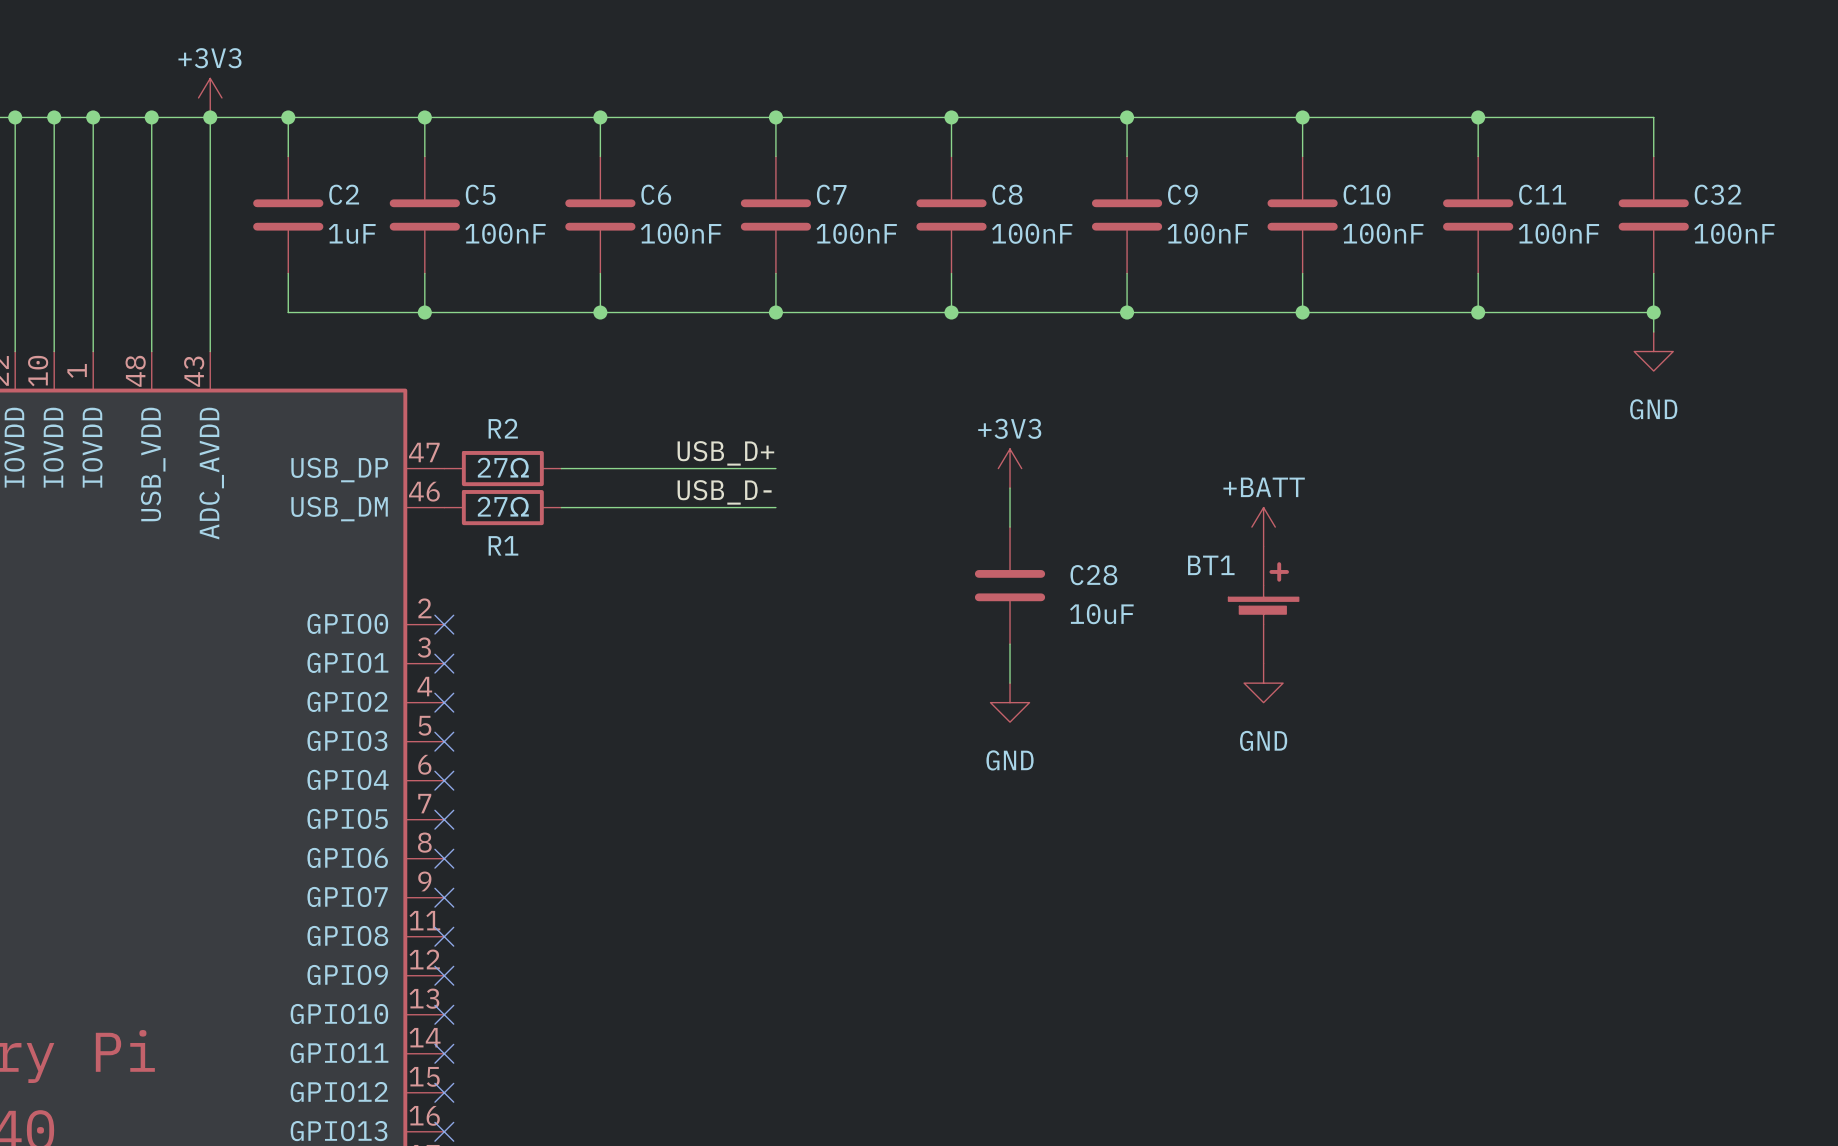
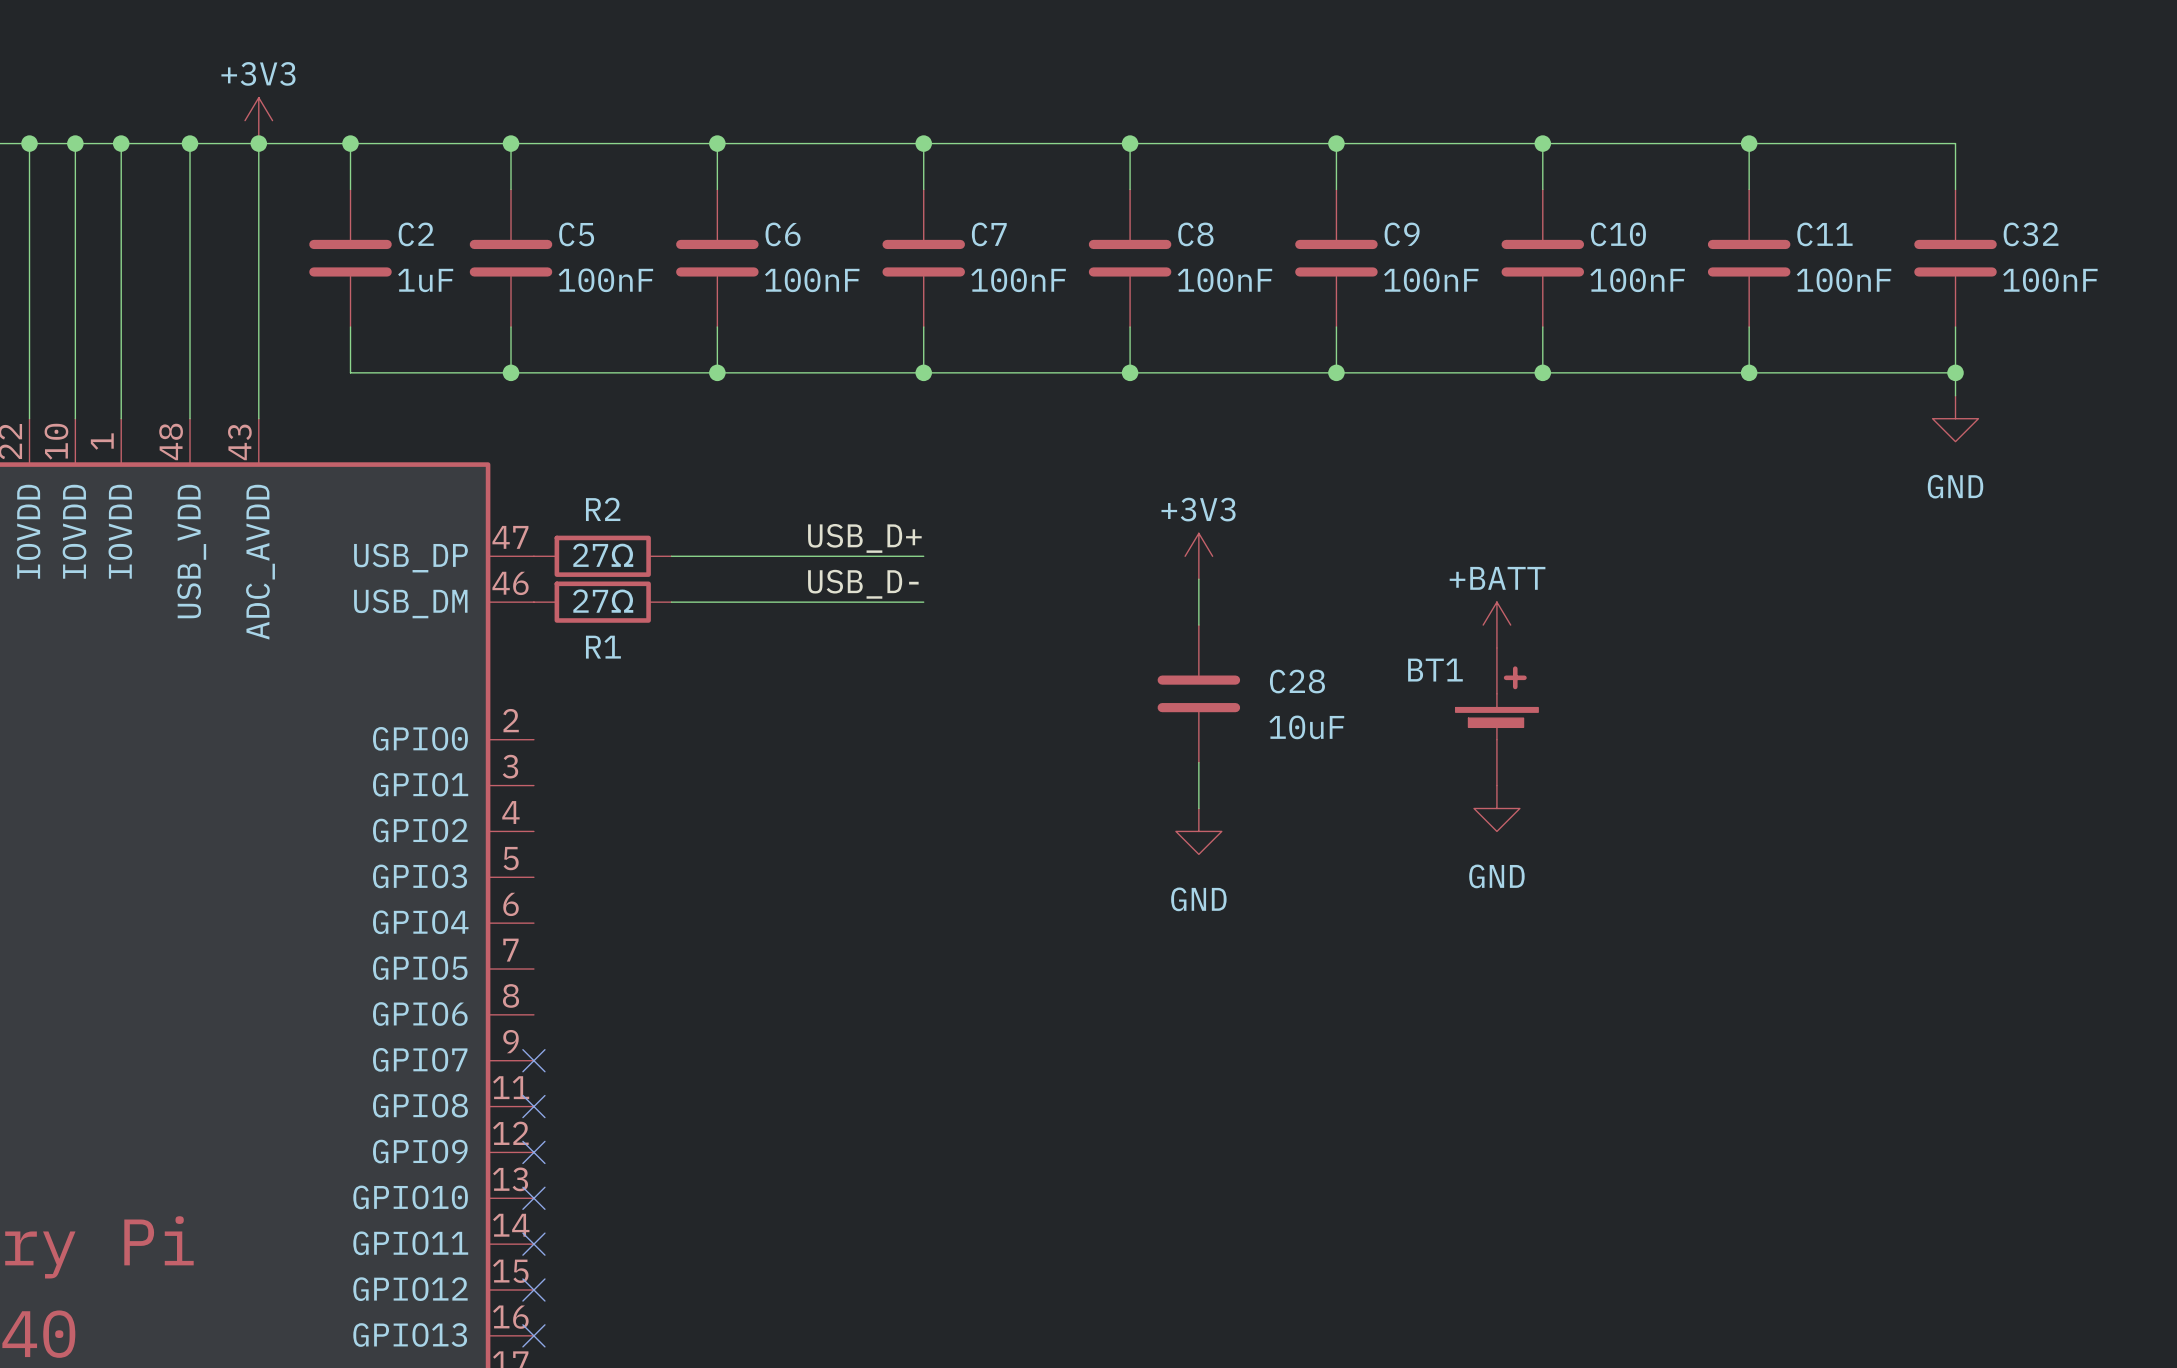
no-connect mark: (444, 624) -> none
no-connect mark: (444, 663) -> none
no-connect mark: (444, 702) -> none
no-connect mark: (444, 741) -> none
no-connect mark: (444, 780) -> none
no-connect mark: (444, 819) -> none
no-connect mark: (444, 858) -> none

